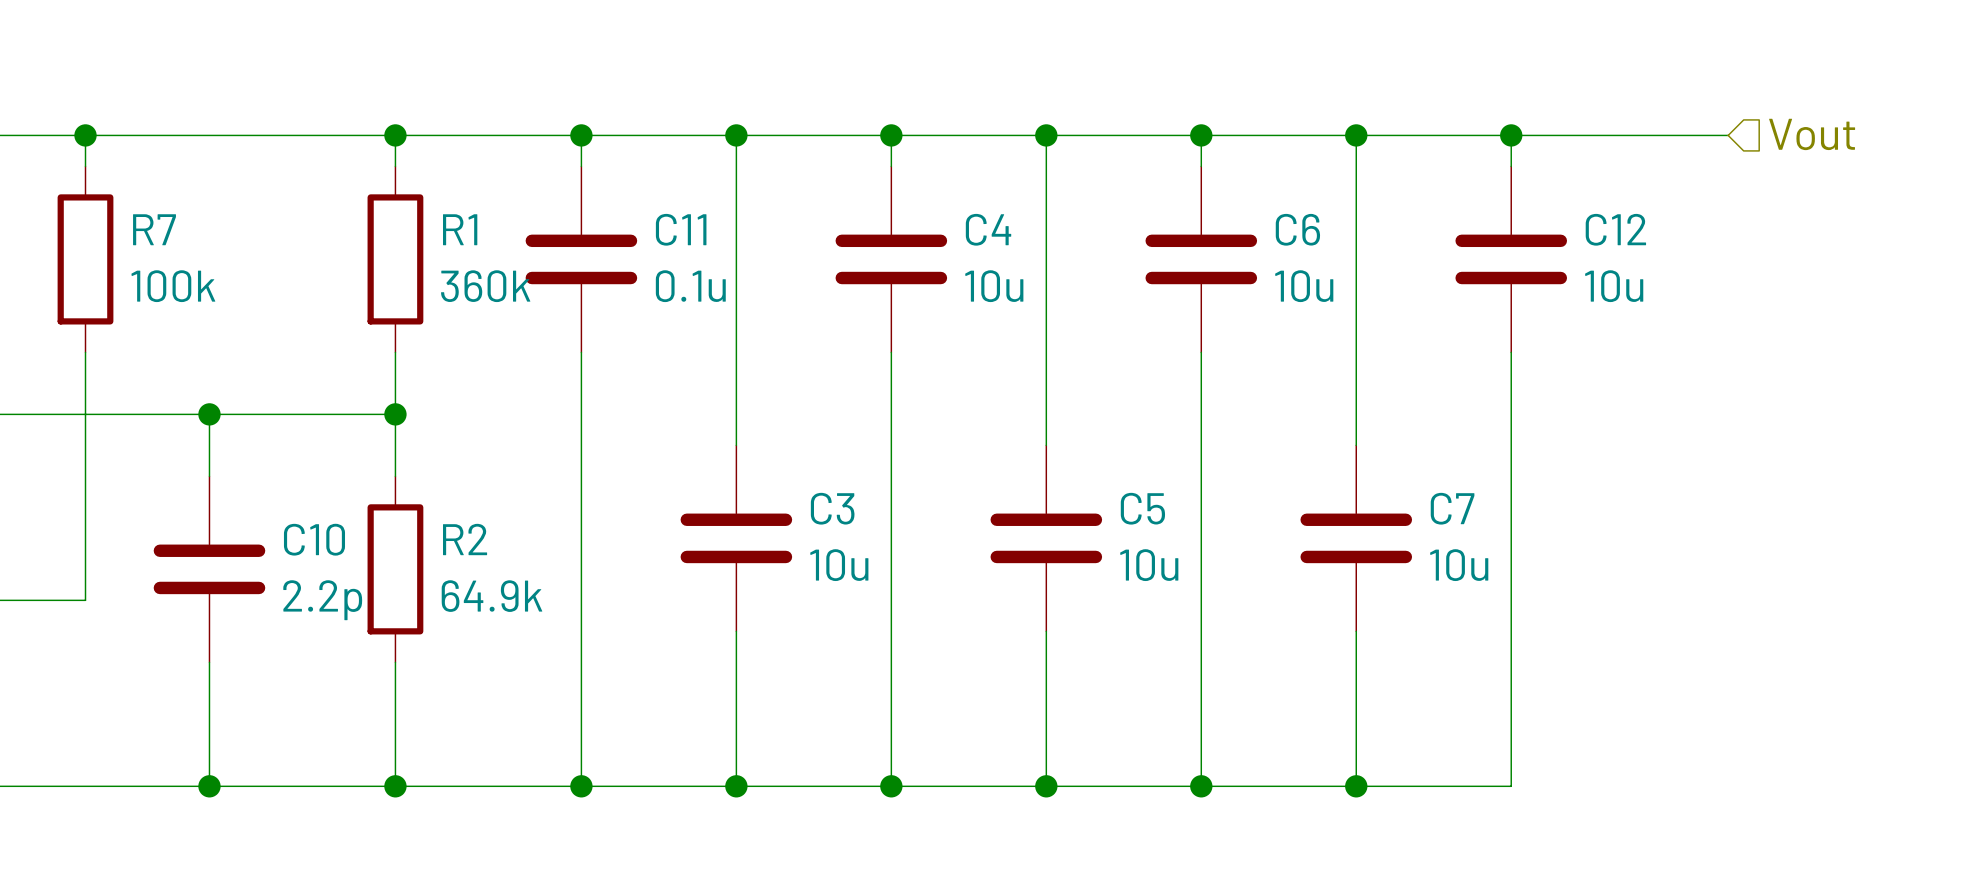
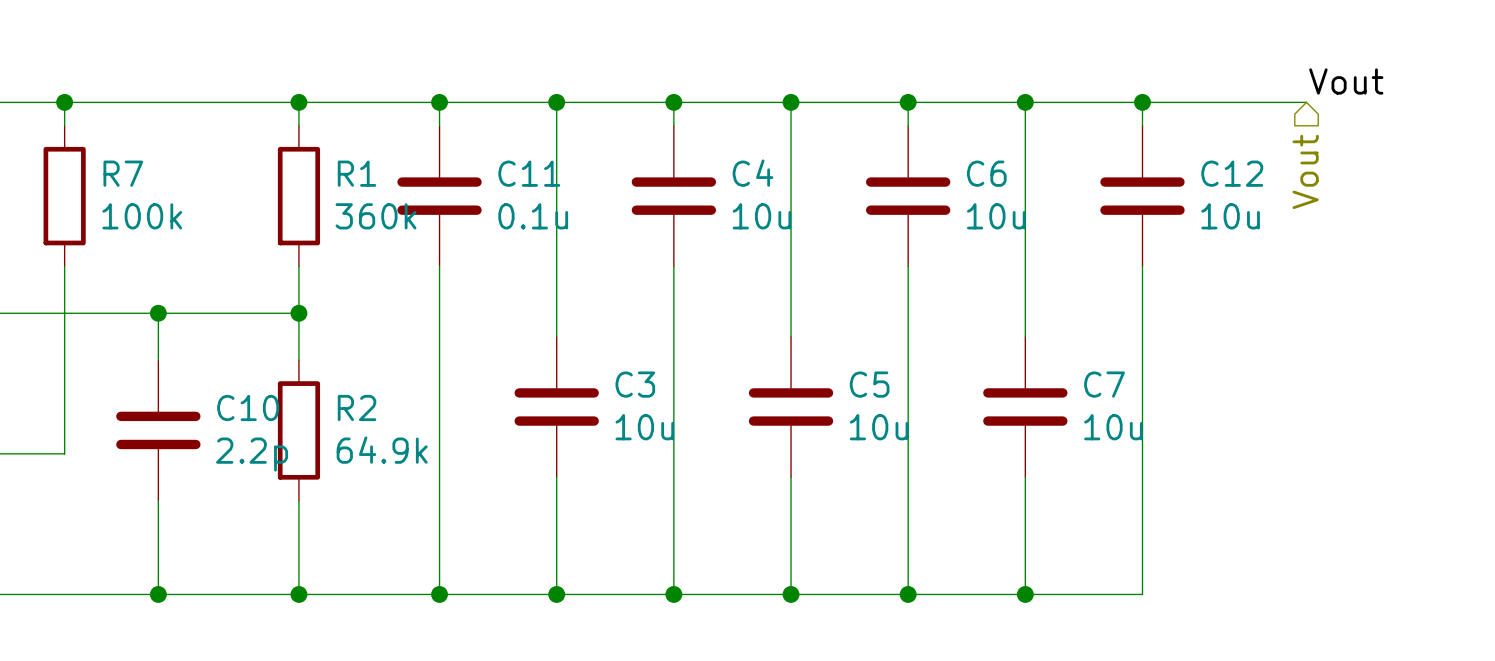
label: none -> Vout (1346, 81)
hierarchical label rotation: 0° (1812, 134) -> 90° clockwise (1305, 171)
hierarchical label position: Vout (1812, 134) -> Vout (1305, 171)

